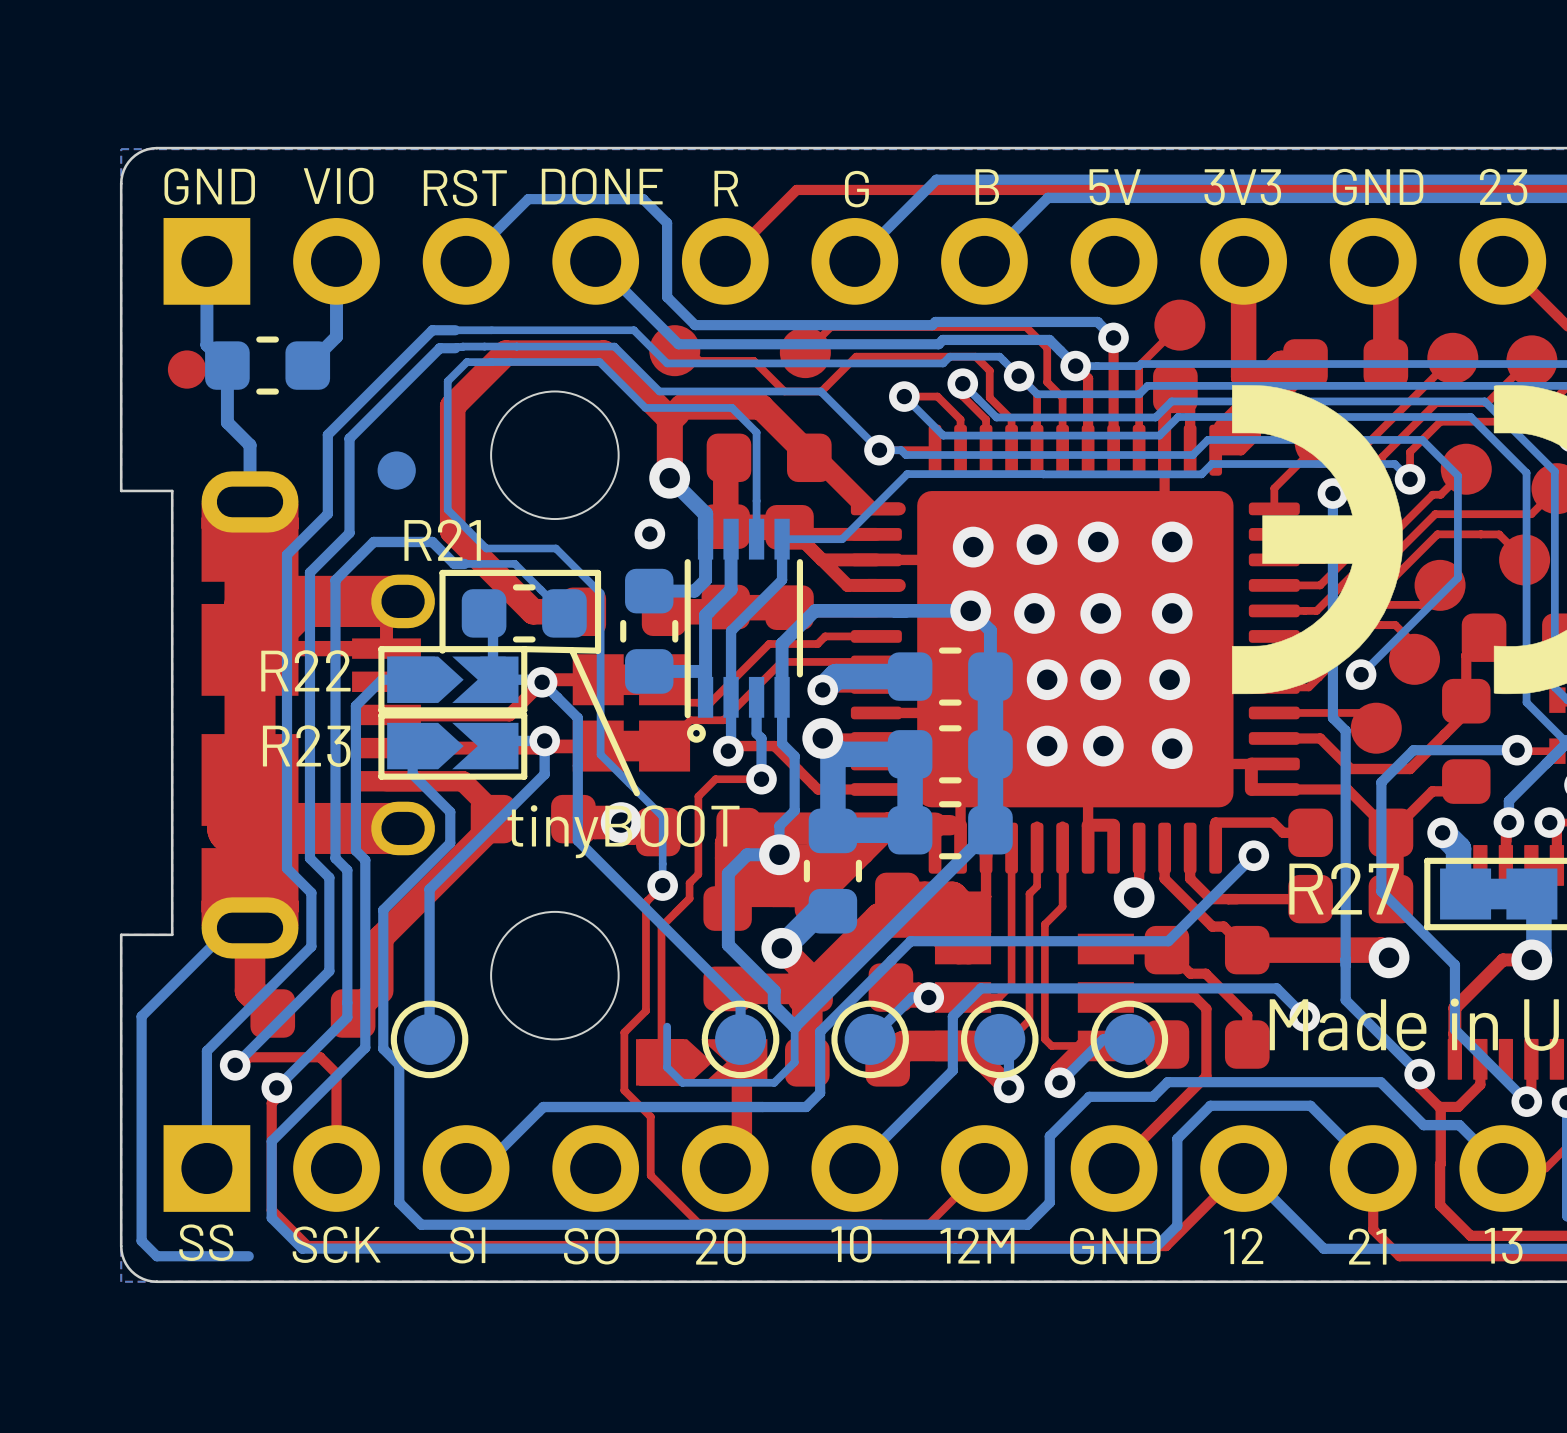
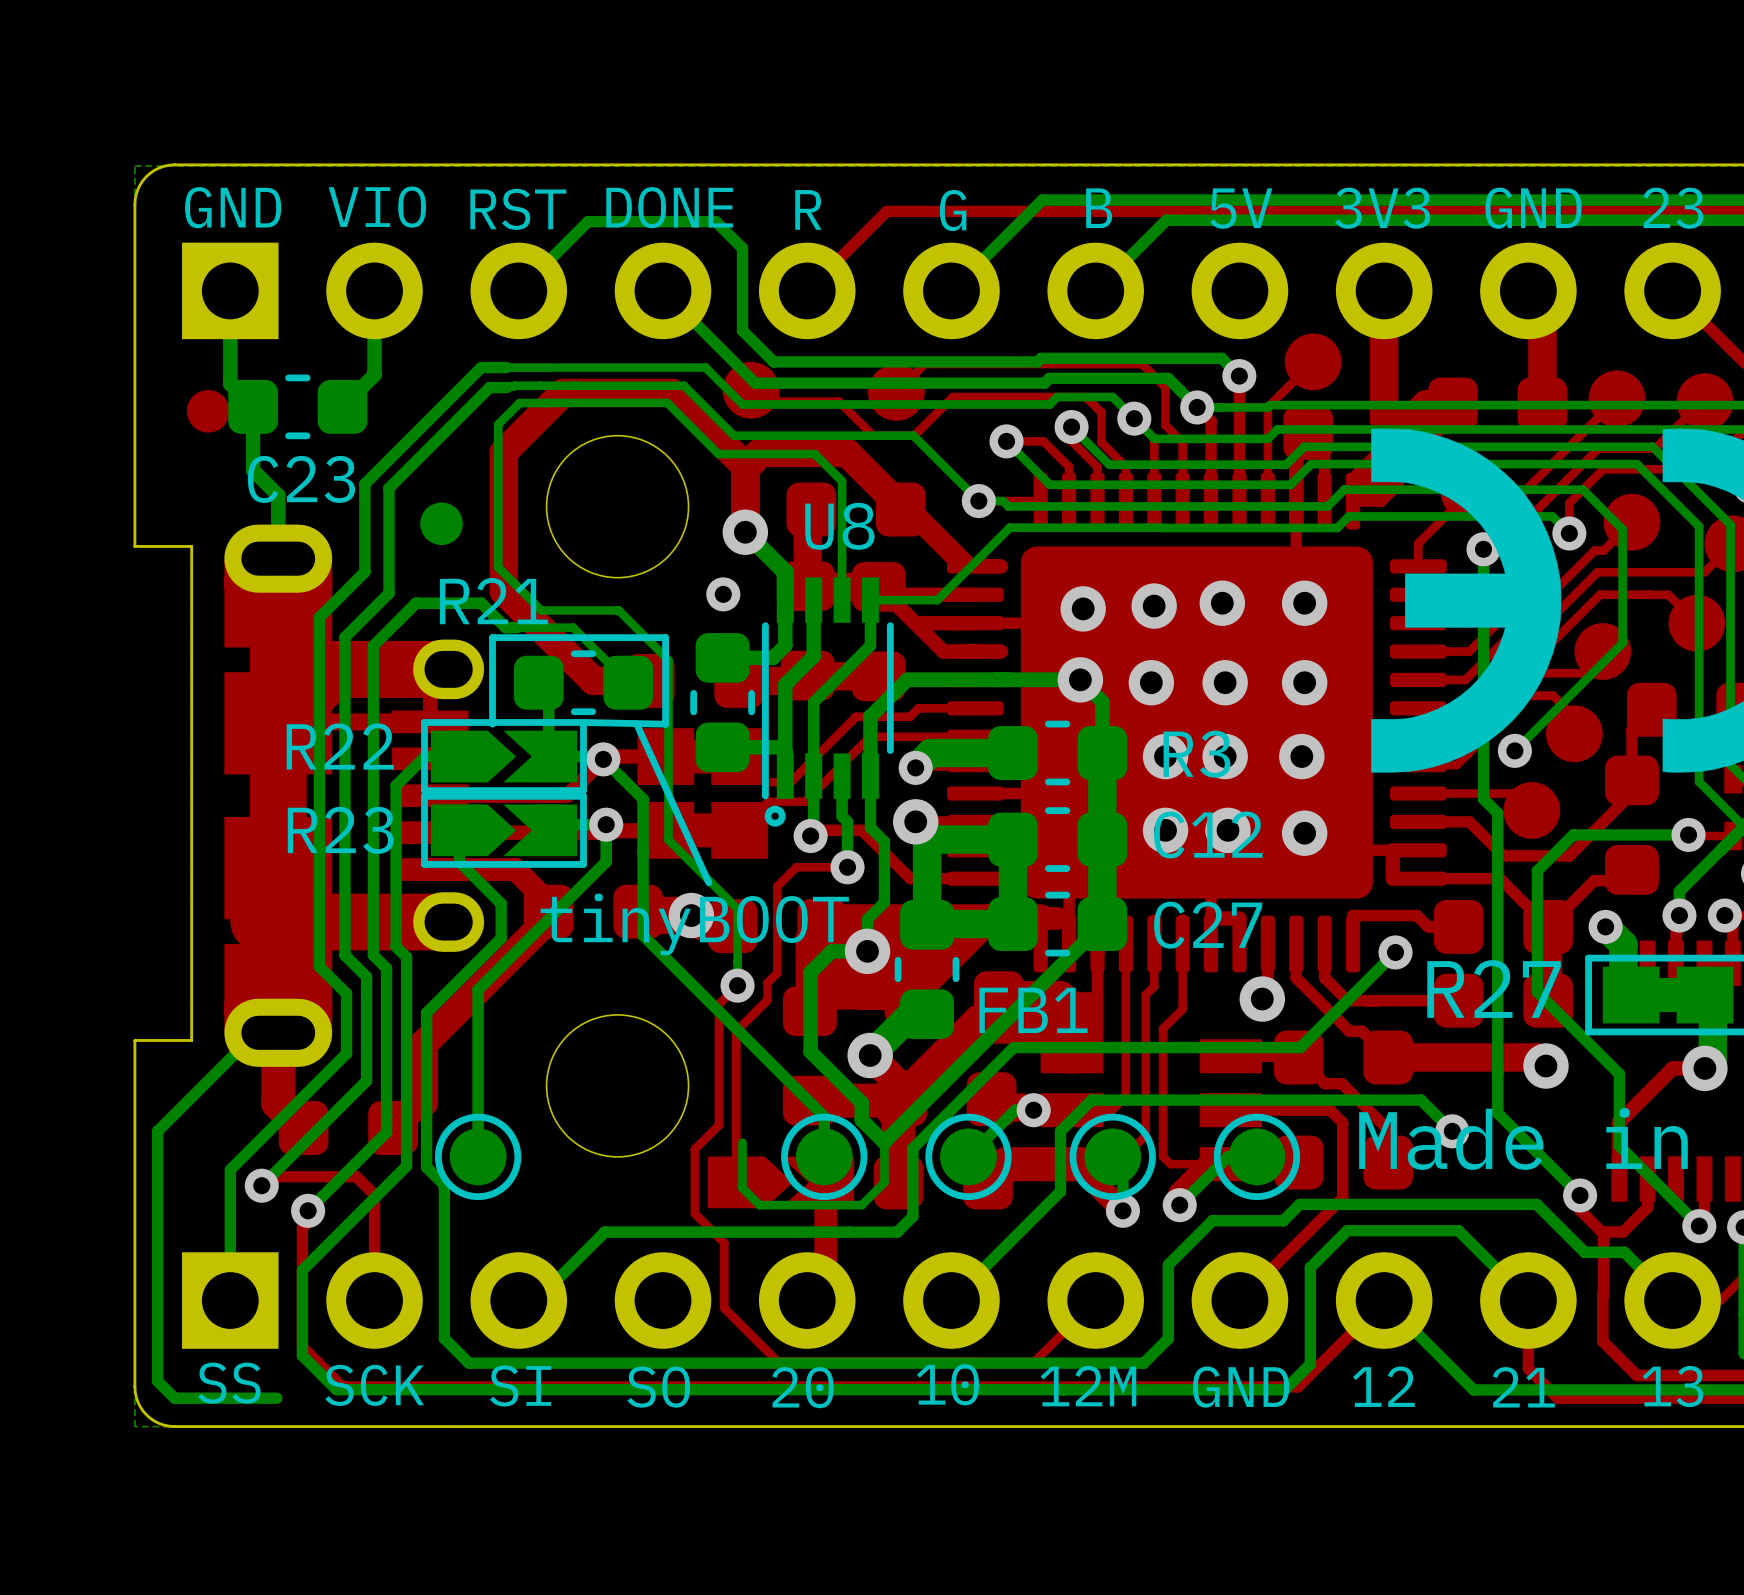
C23 name: none -> C23 (301, 479)
U8 name: none -> U8 (839, 526)
R3 name: none -> R3 (1197, 754)
C12 name: none -> C12 (1208, 835)
C27 name: none -> C27 (1208, 925)
FB1 name: none -> FB1 (1033, 1010)

